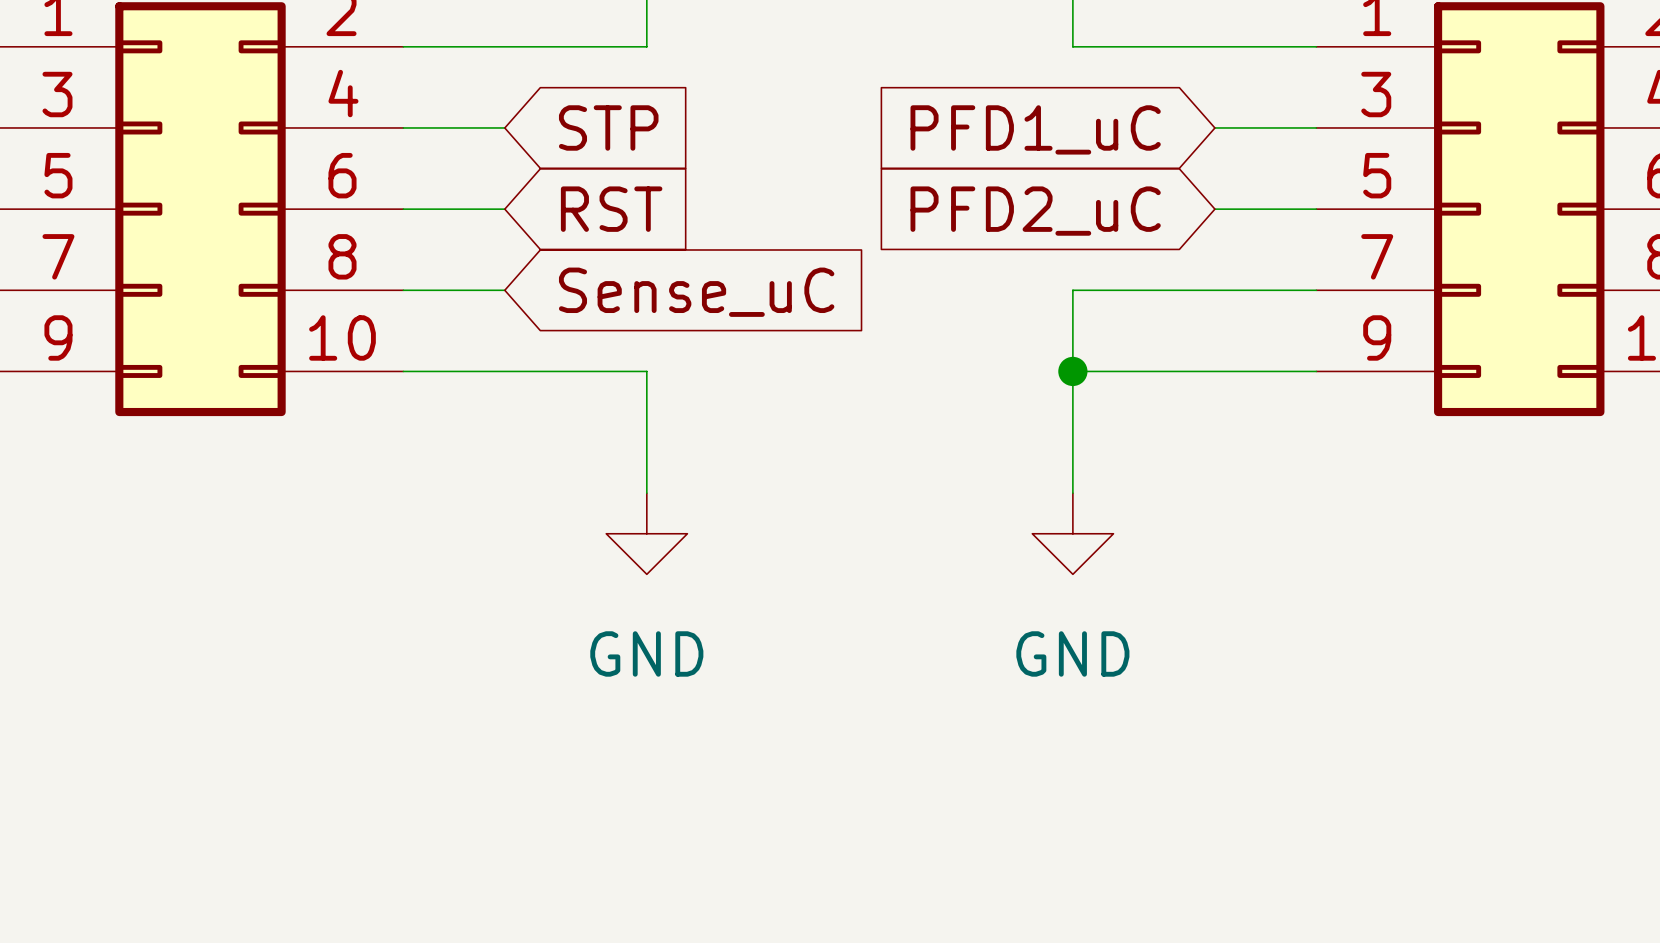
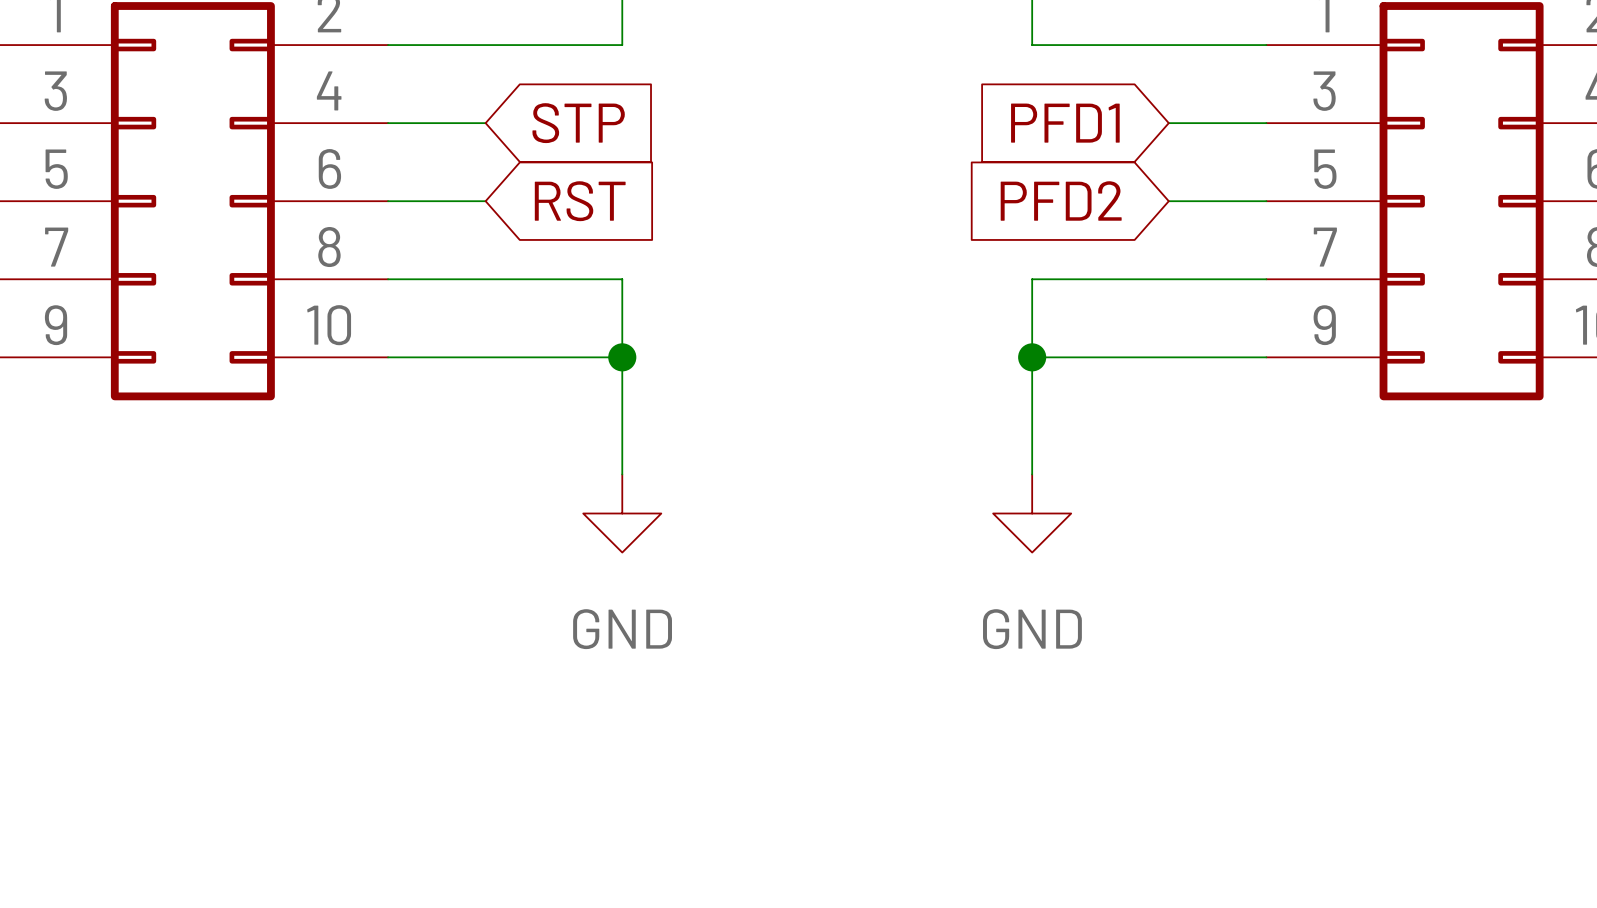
global label: PFD1_uC (1035, 129) -> PFD1 (1065, 123)
global label: PFD2_uC (1035, 211) -> PFD2 (1061, 200)
wire: none -> (485, 279) (622, 279) (622, 357)
global label: Sense_uC (696, 292) -> none
junction: none -> (622, 357)

